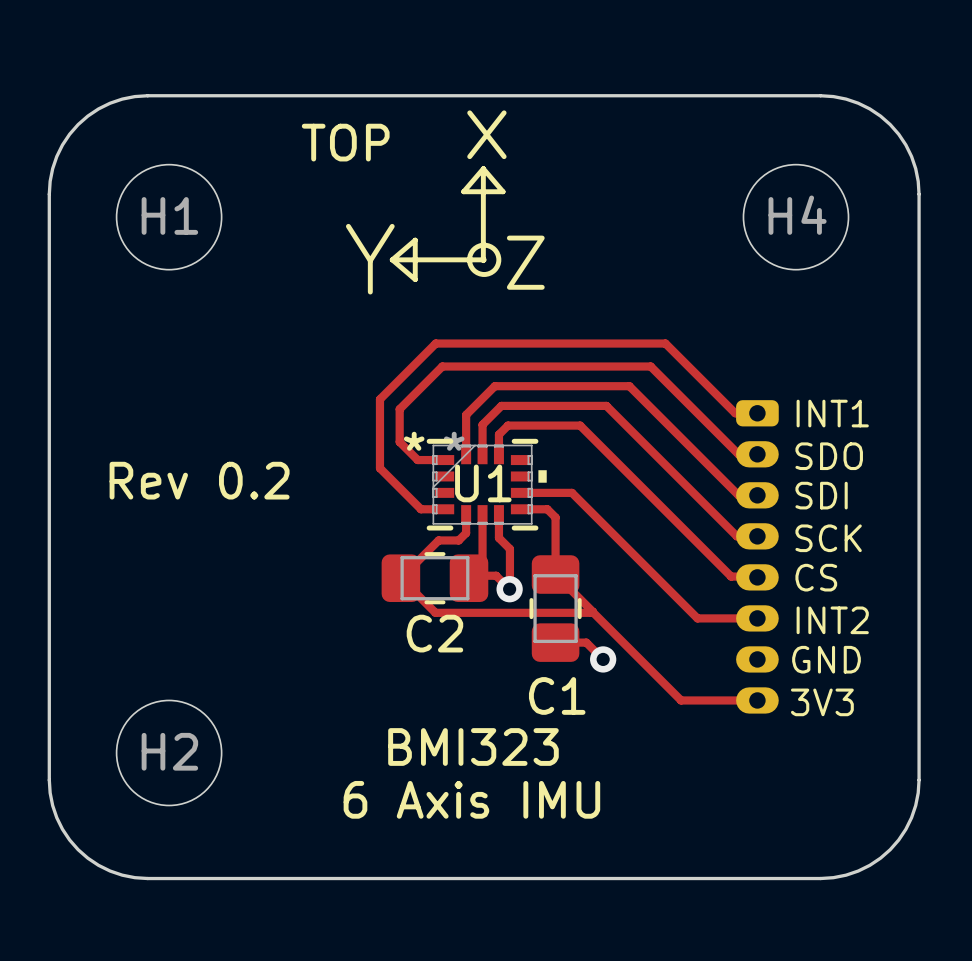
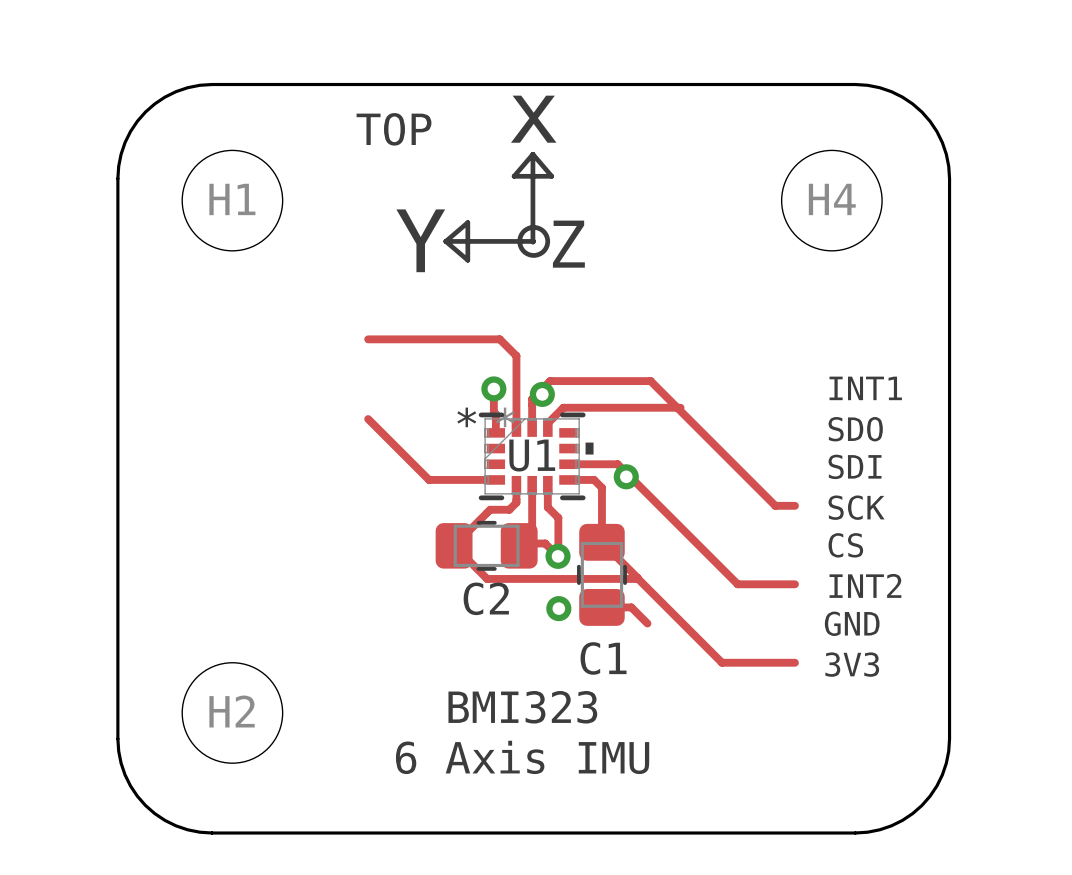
track: (757, 413) (735, 413) (665, 343) (435, 343) (379, 399) (379, 468) (421, 509) -> (368, 419) (429, 479) (473, 479)
via: none -> (493, 388)
track: (466, 414) (494, 386) (629, 386) (738, 495) (757, 495) -> (516, 389) (516, 355) (499, 339) (368, 339)
via: none -> (542, 394)
track: none -> (680, 407) (563, 407) (547, 423)
track: (498, 454) (498, 434) (507, 425) (580, 425) (731, 576) (756, 576) -> none
track: (757, 454) (738, 454) (650, 366) (442, 366) (399, 409) (399, 442) (417, 460) (444, 460) -> (493, 388) (495, 432)
text: Rev 0.2 (199, 480) -> none
via: none -> (626, 476)
part: (757, 556) -> none
via: none -> (558, 608)
via: (603, 659) -> none

